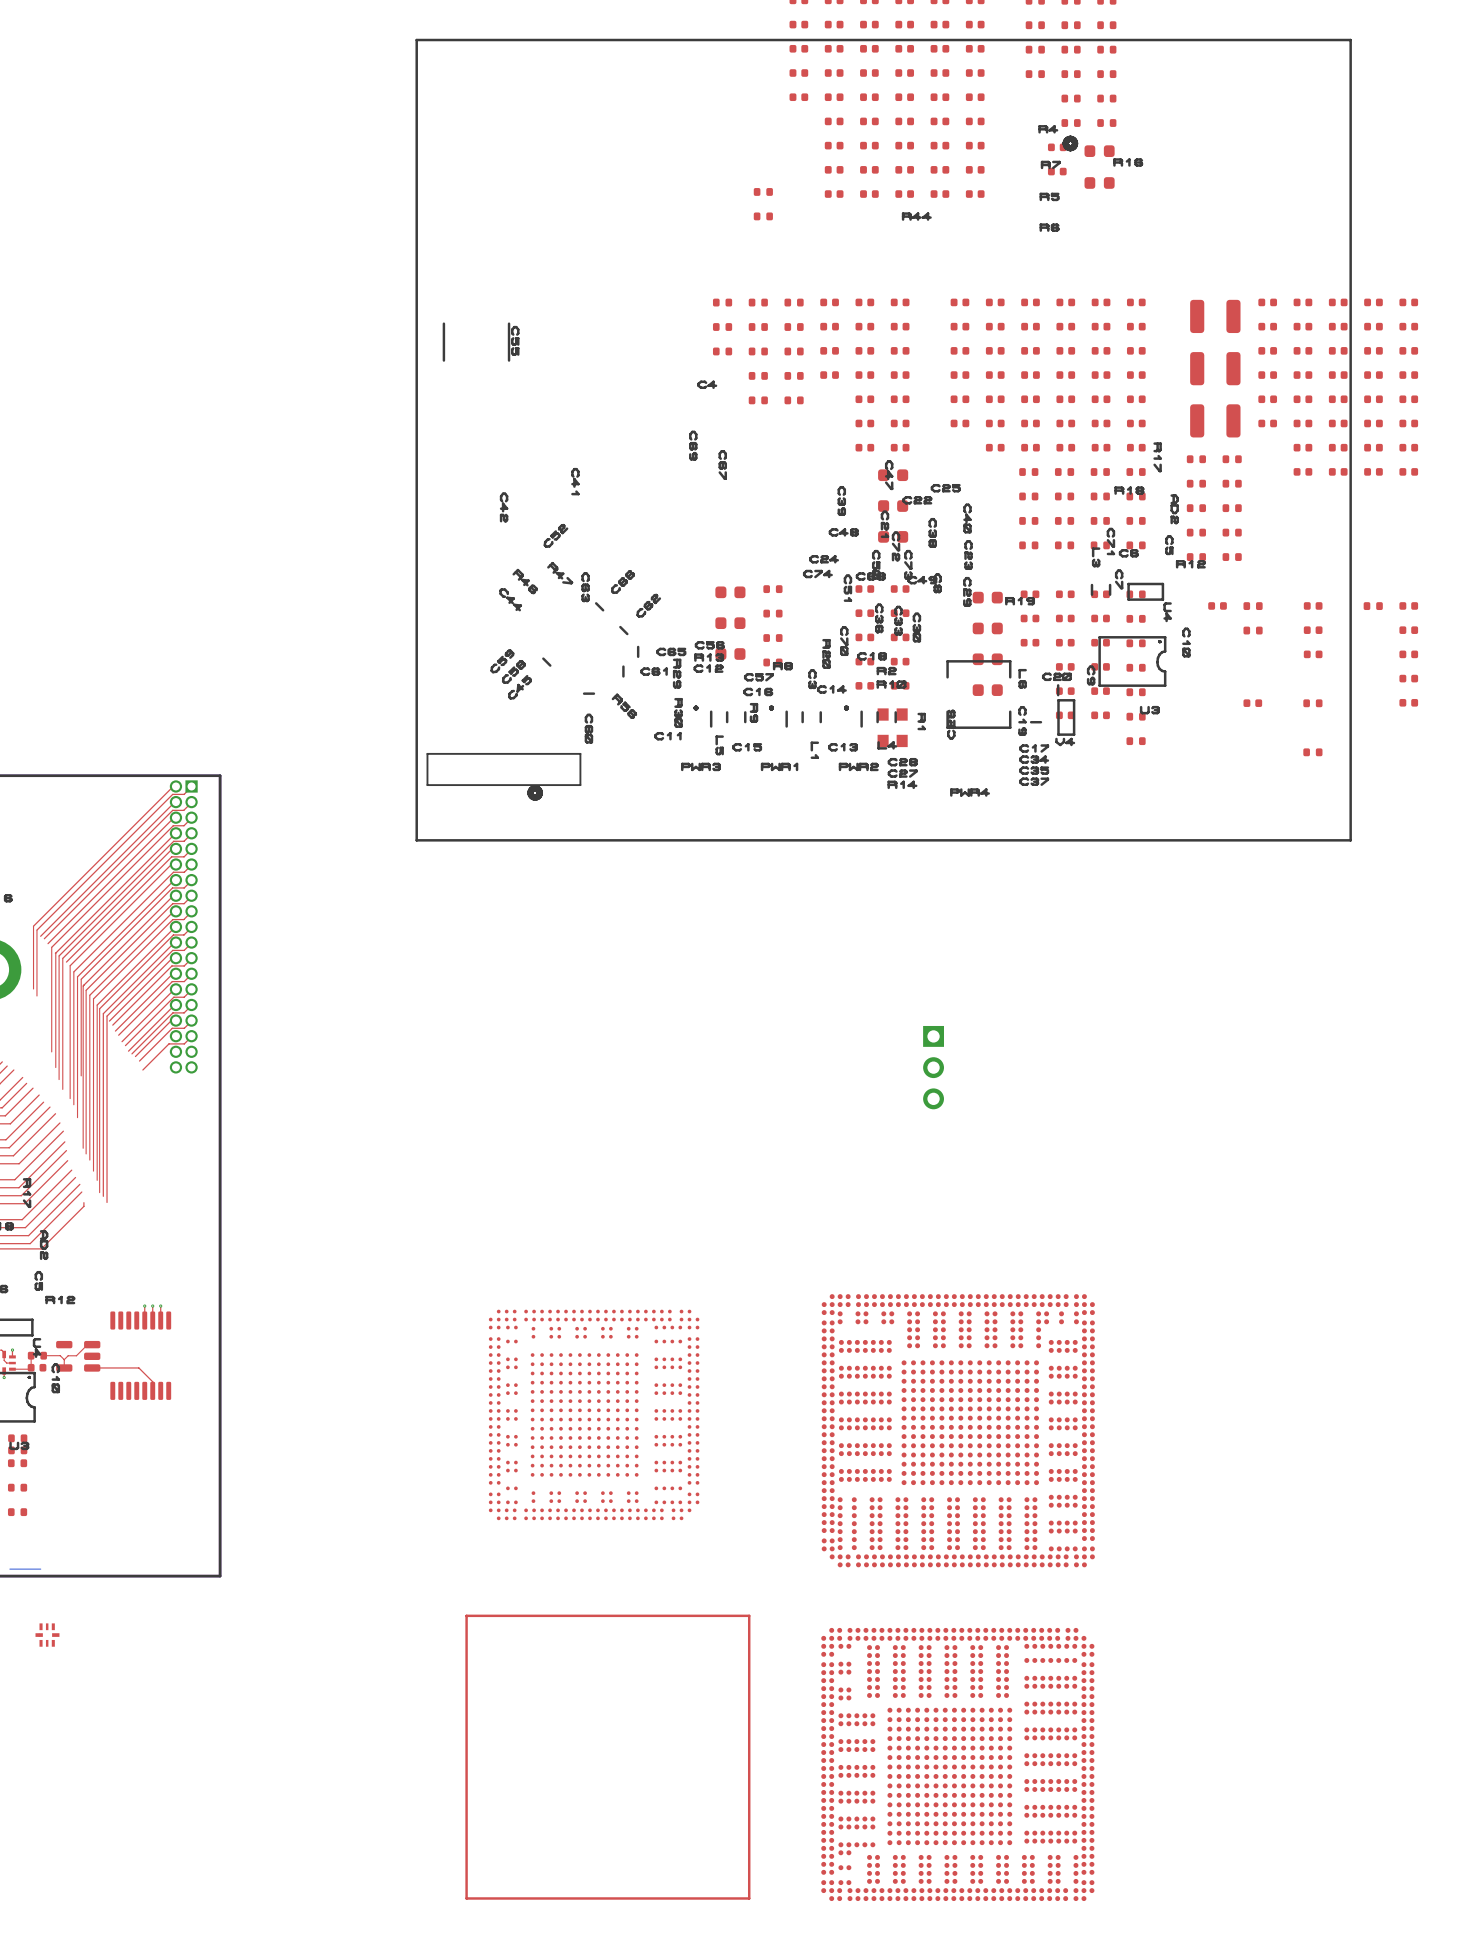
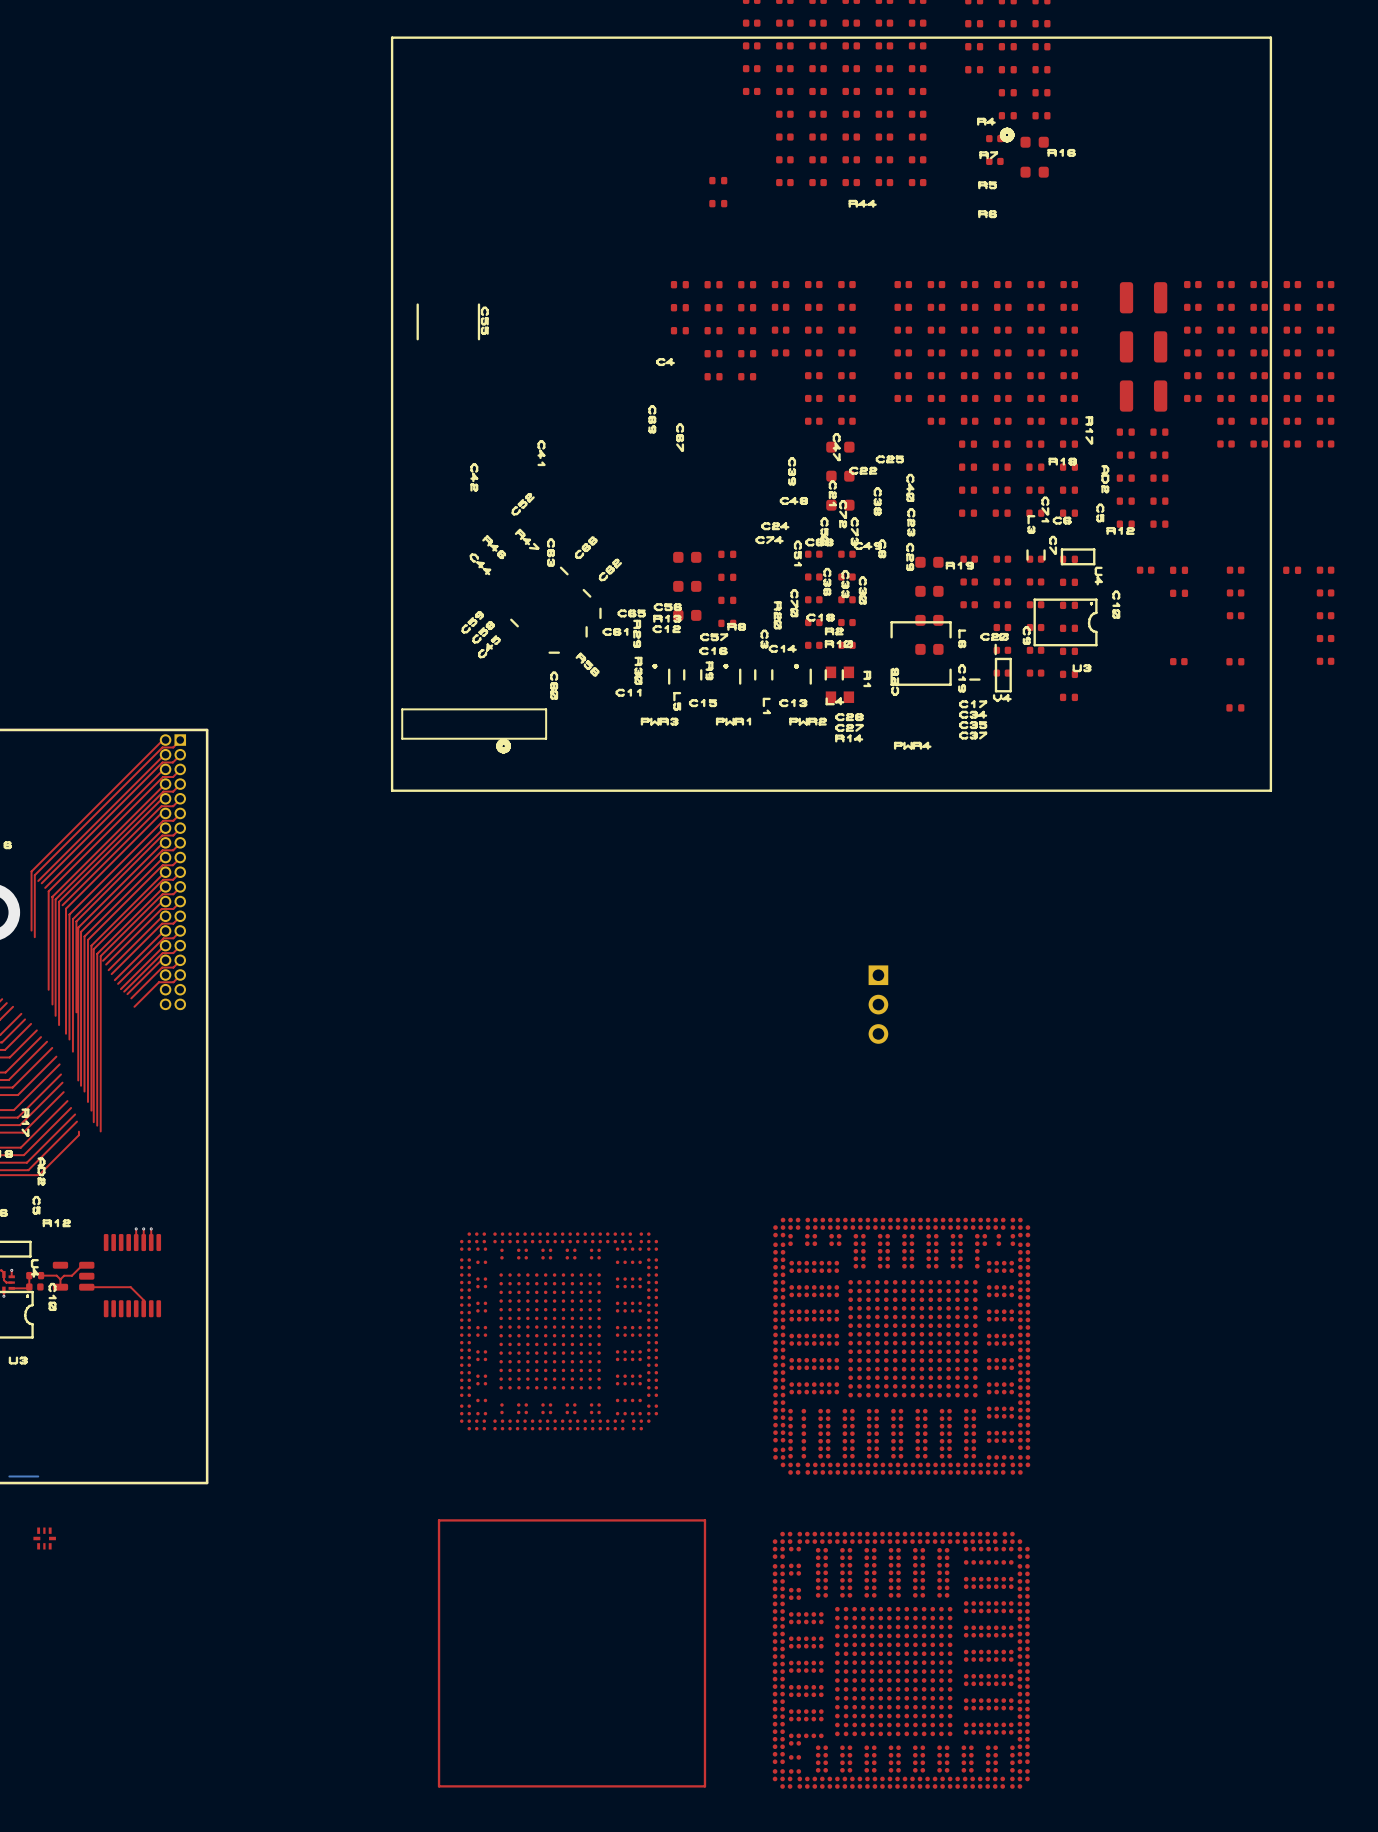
part: (17, 1438) -> none
part: (17, 1450) -> none
part: (17, 1463) -> none
part: (17, 1487) -> none
part: (17, 1512) -> none

